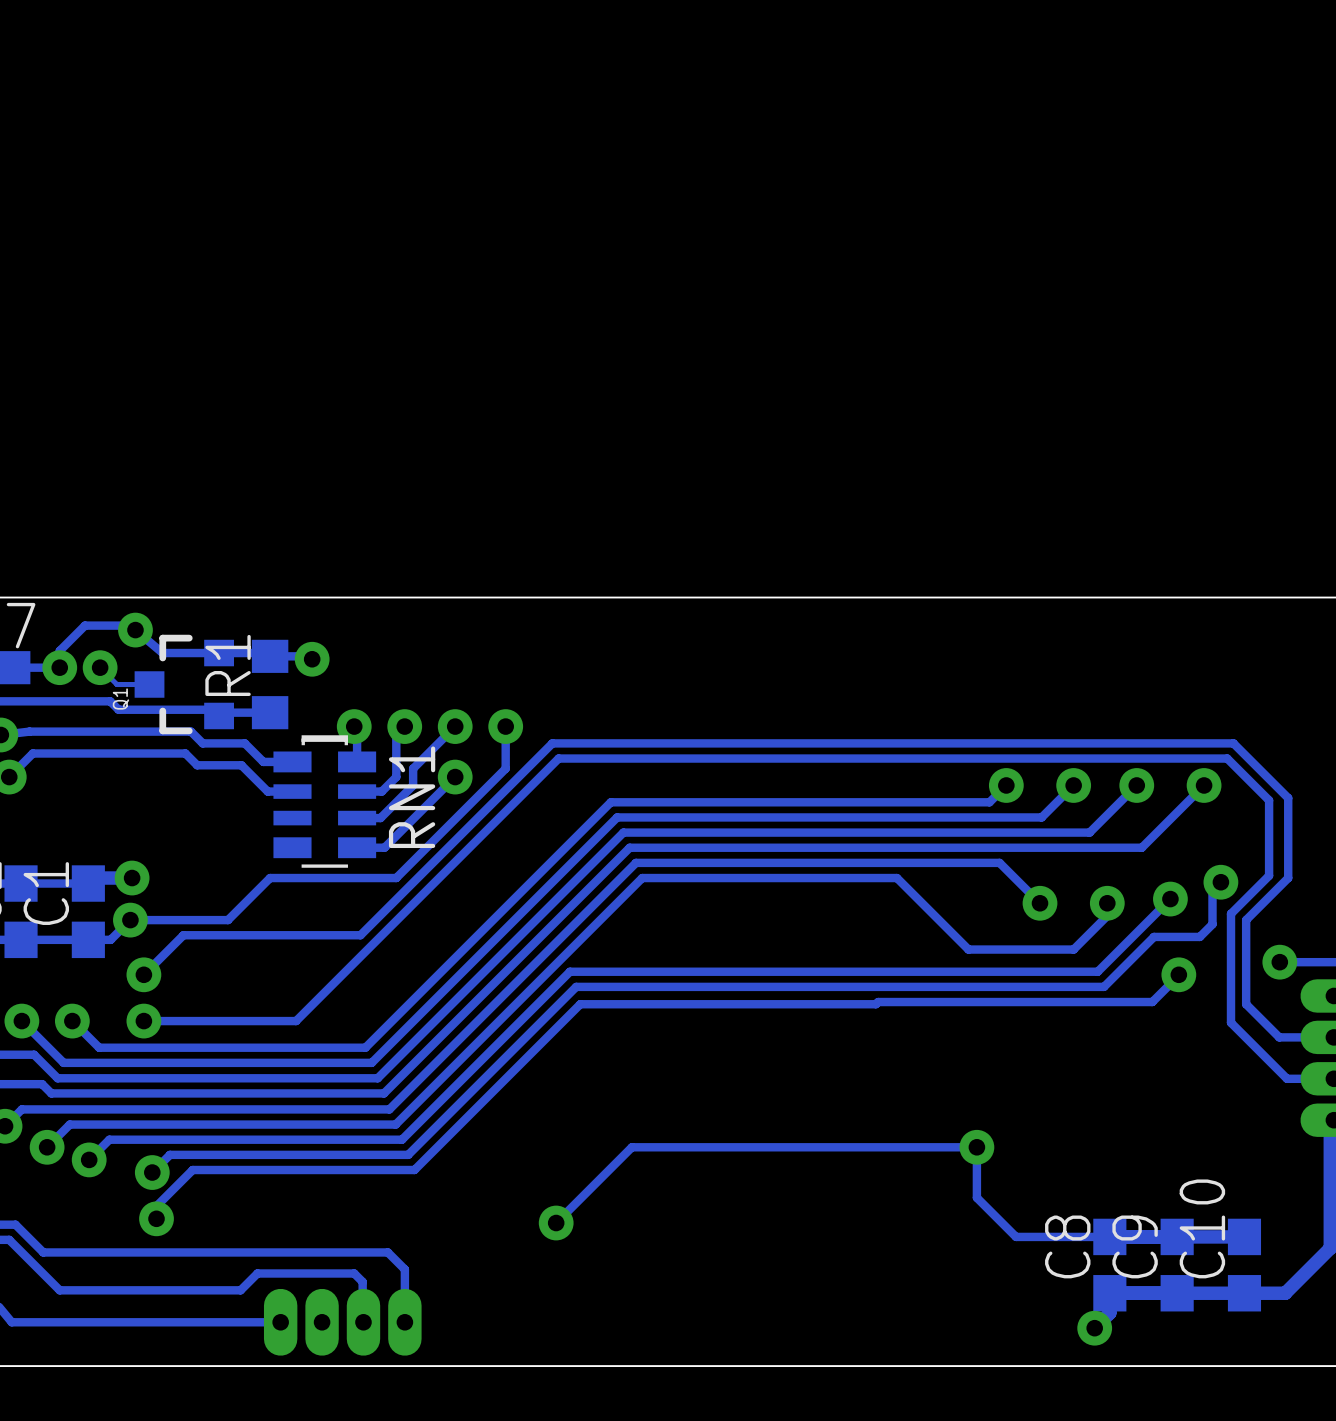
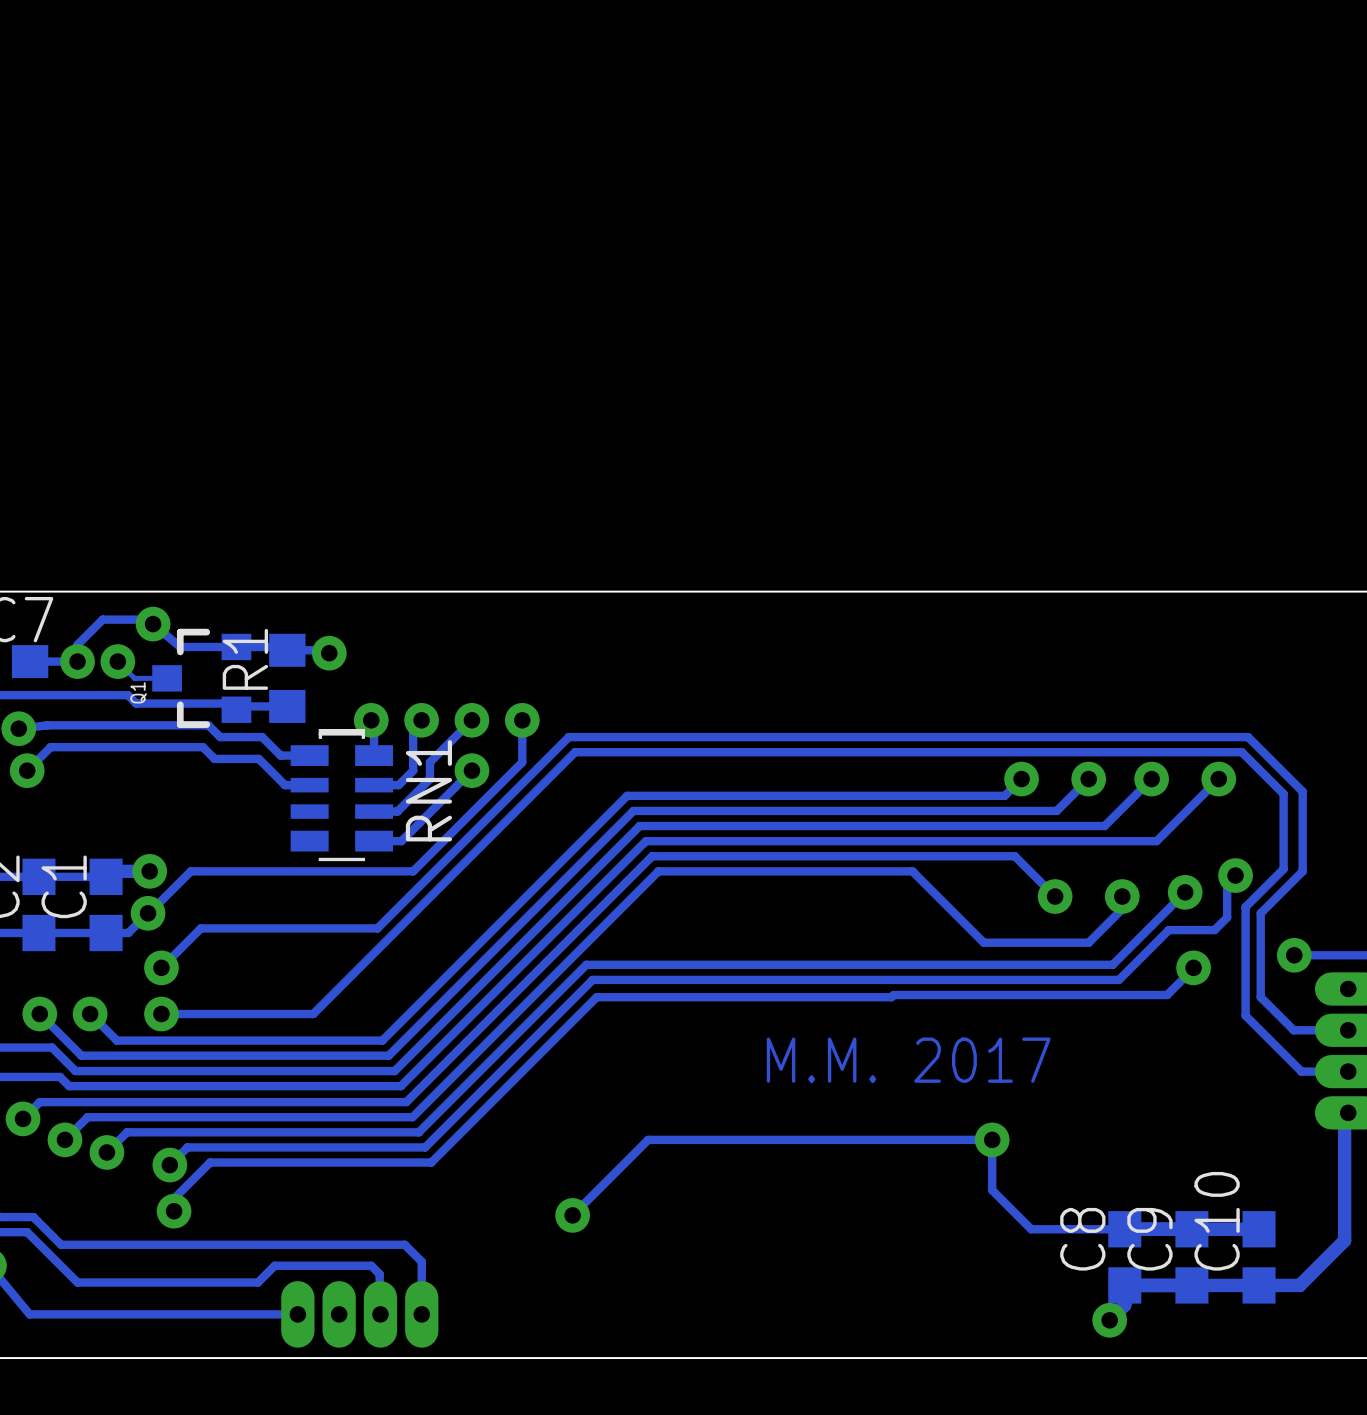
track: (270, 878) (228, 920) (131, 920) -> (287, 871) (190, 871) (148, 913)
text: none -> M.M. 2017 (908, 1060)

